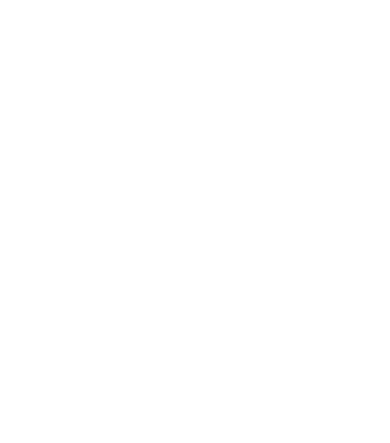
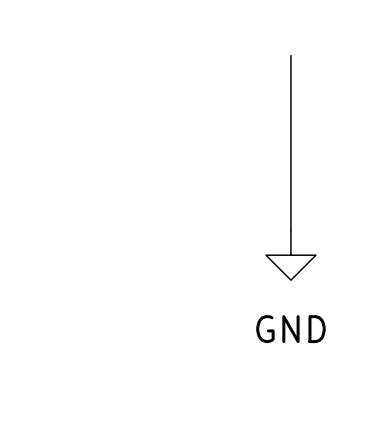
wire: none -> (290, 55) (290, 230)
power symbol: none -> GND (290, 255)

